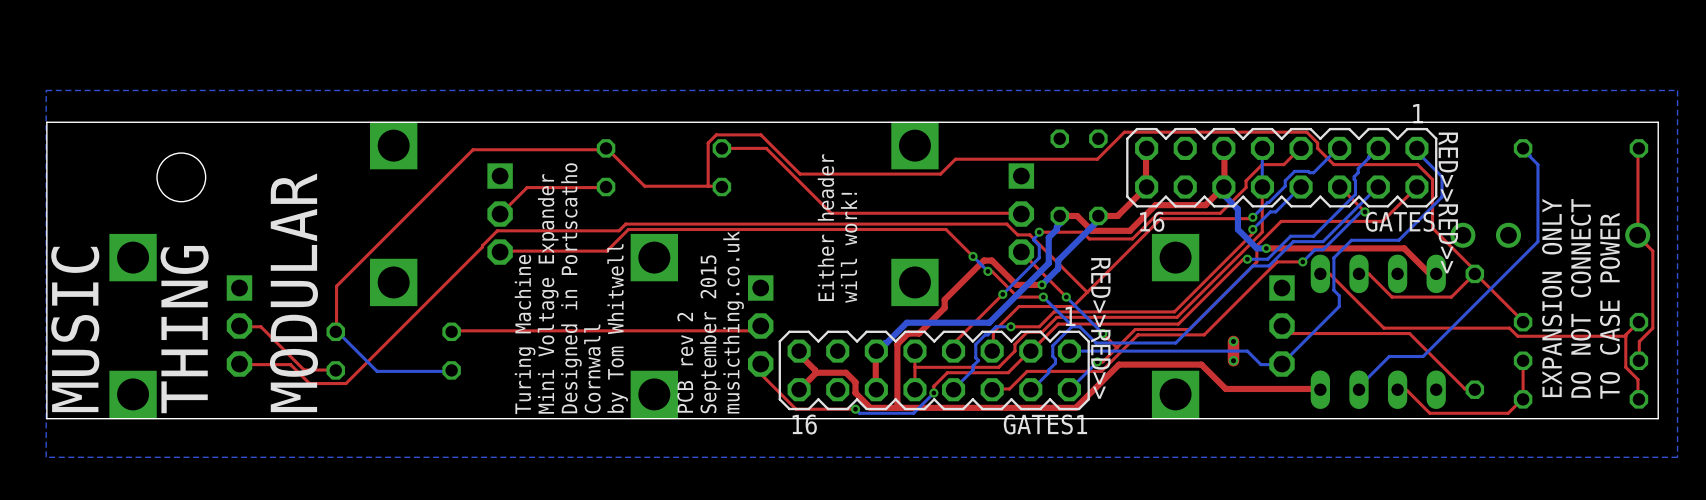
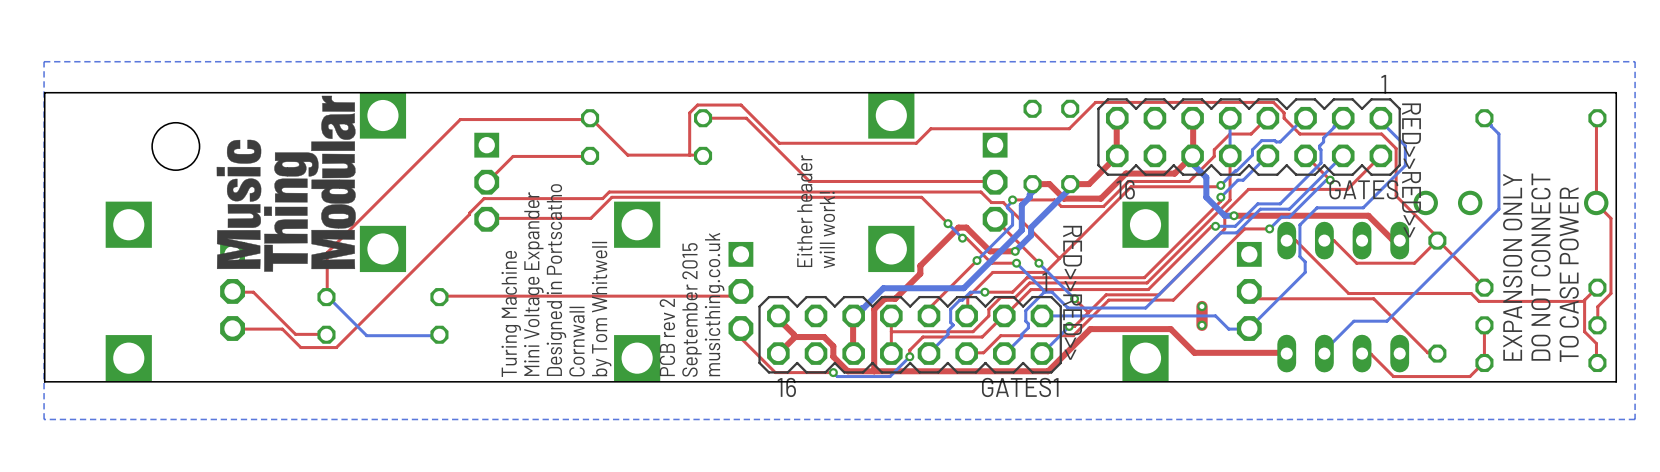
drawing: none -> [216, 95, 356, 272]
text: MODULAR (293, 292) -> none
text: MUSIC (75, 329) -> none
text: THING (184, 329) -> none

